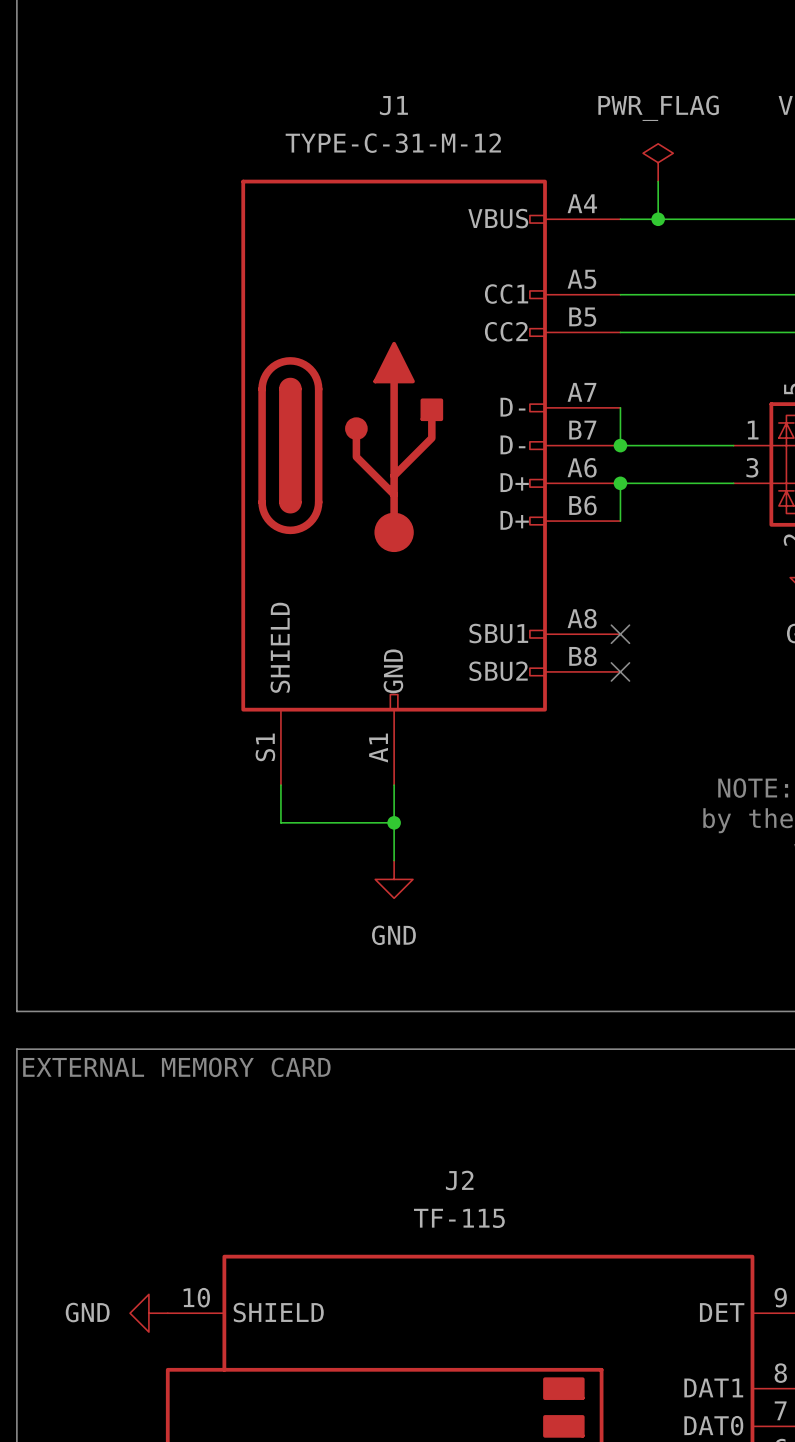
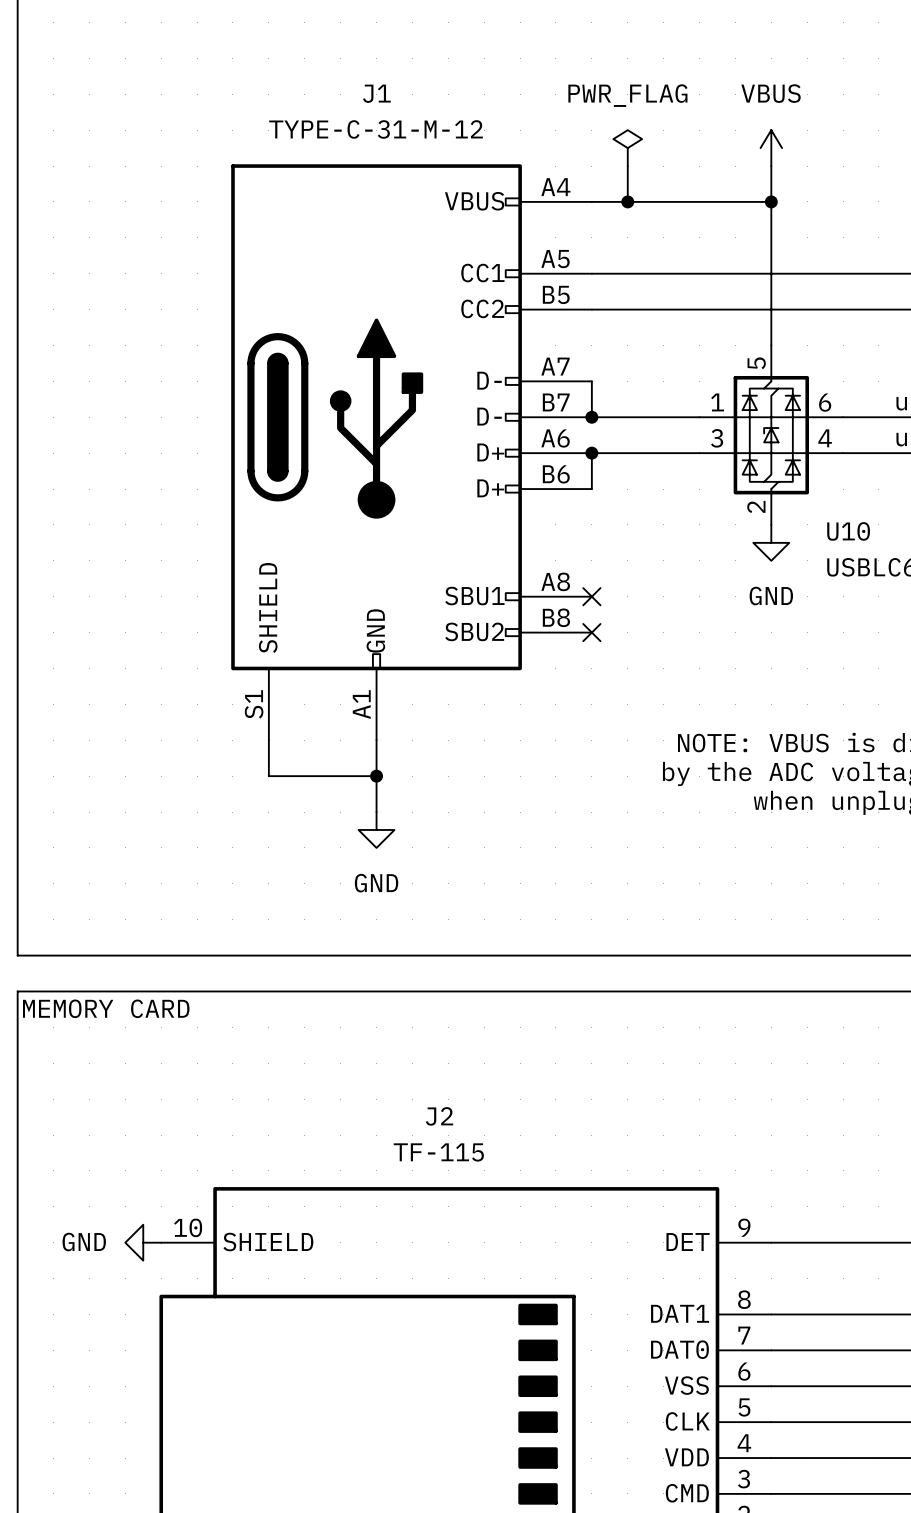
text: EXTERNAL MEMORY CARD (176, 1067) -> MEMORY CARD (106, 1008)

